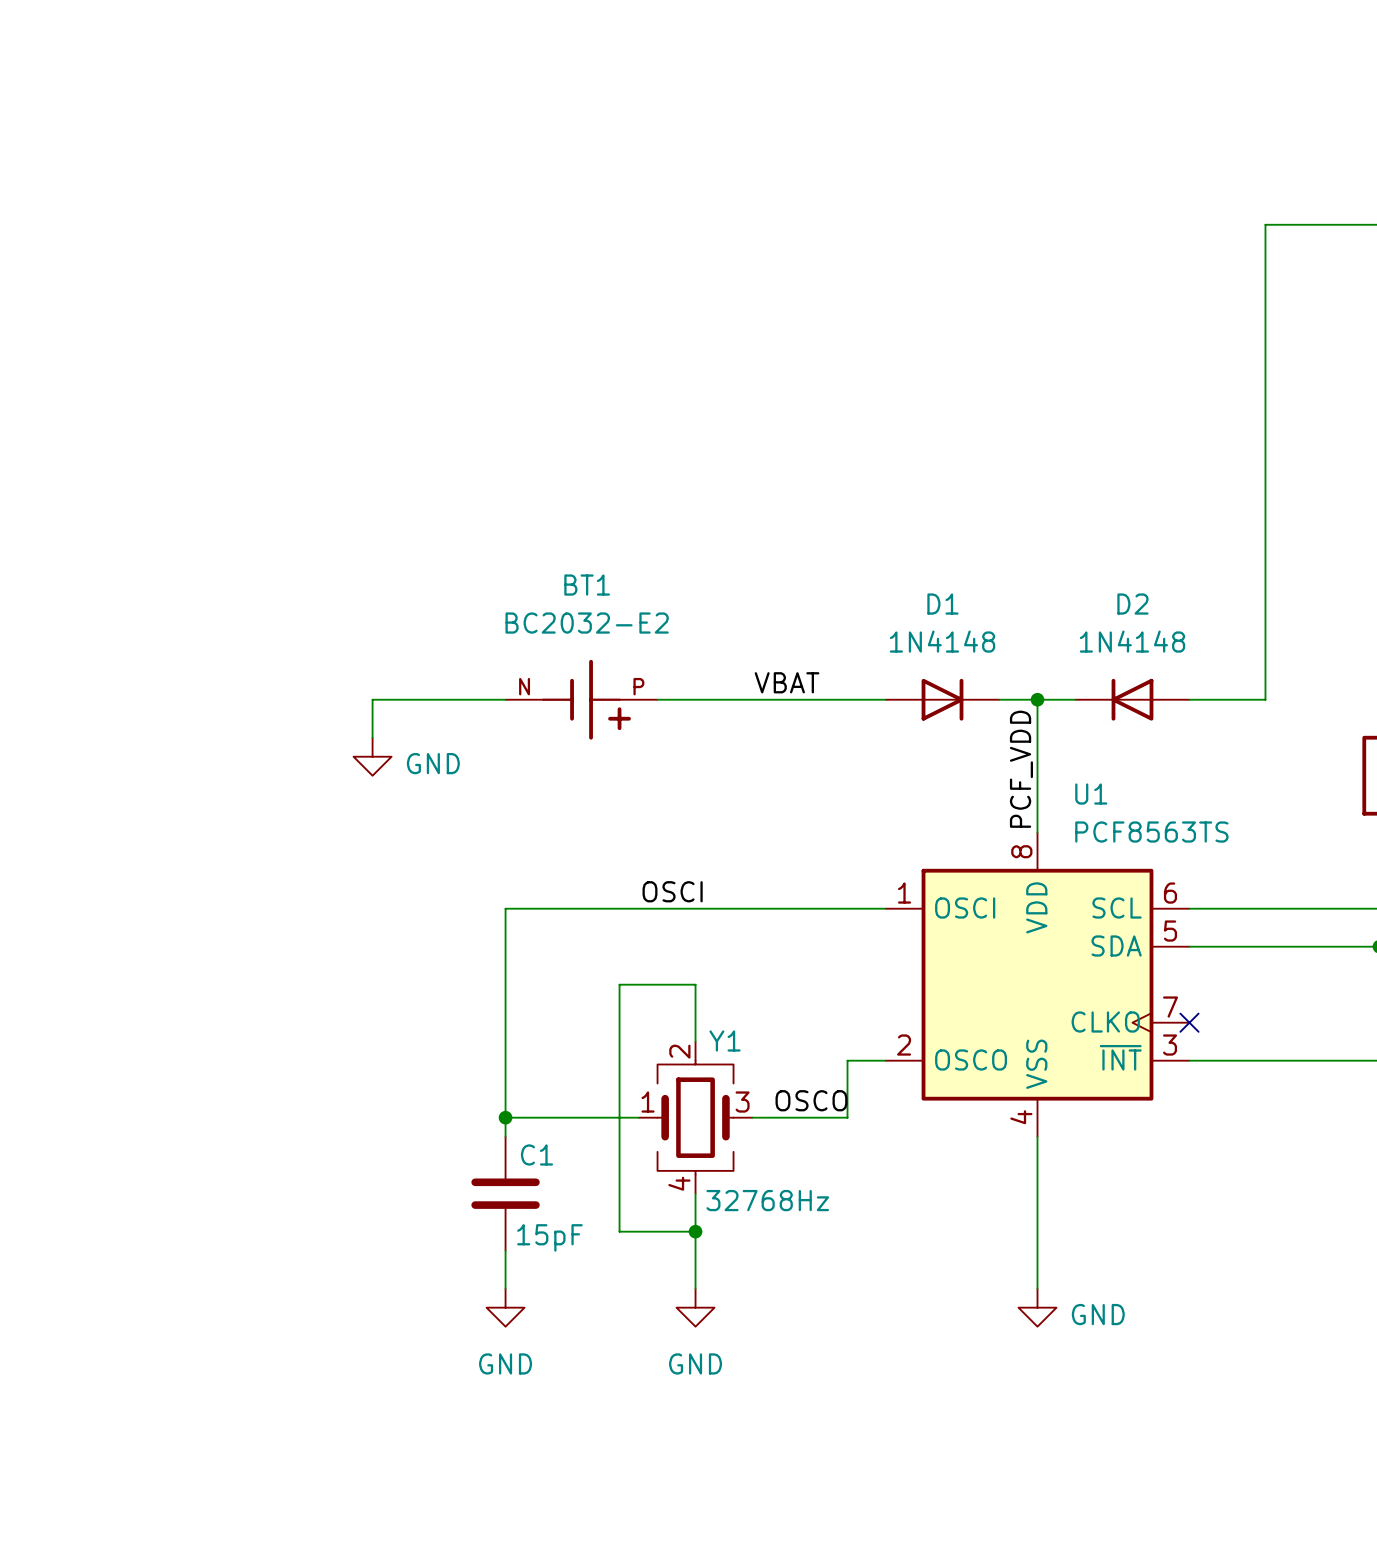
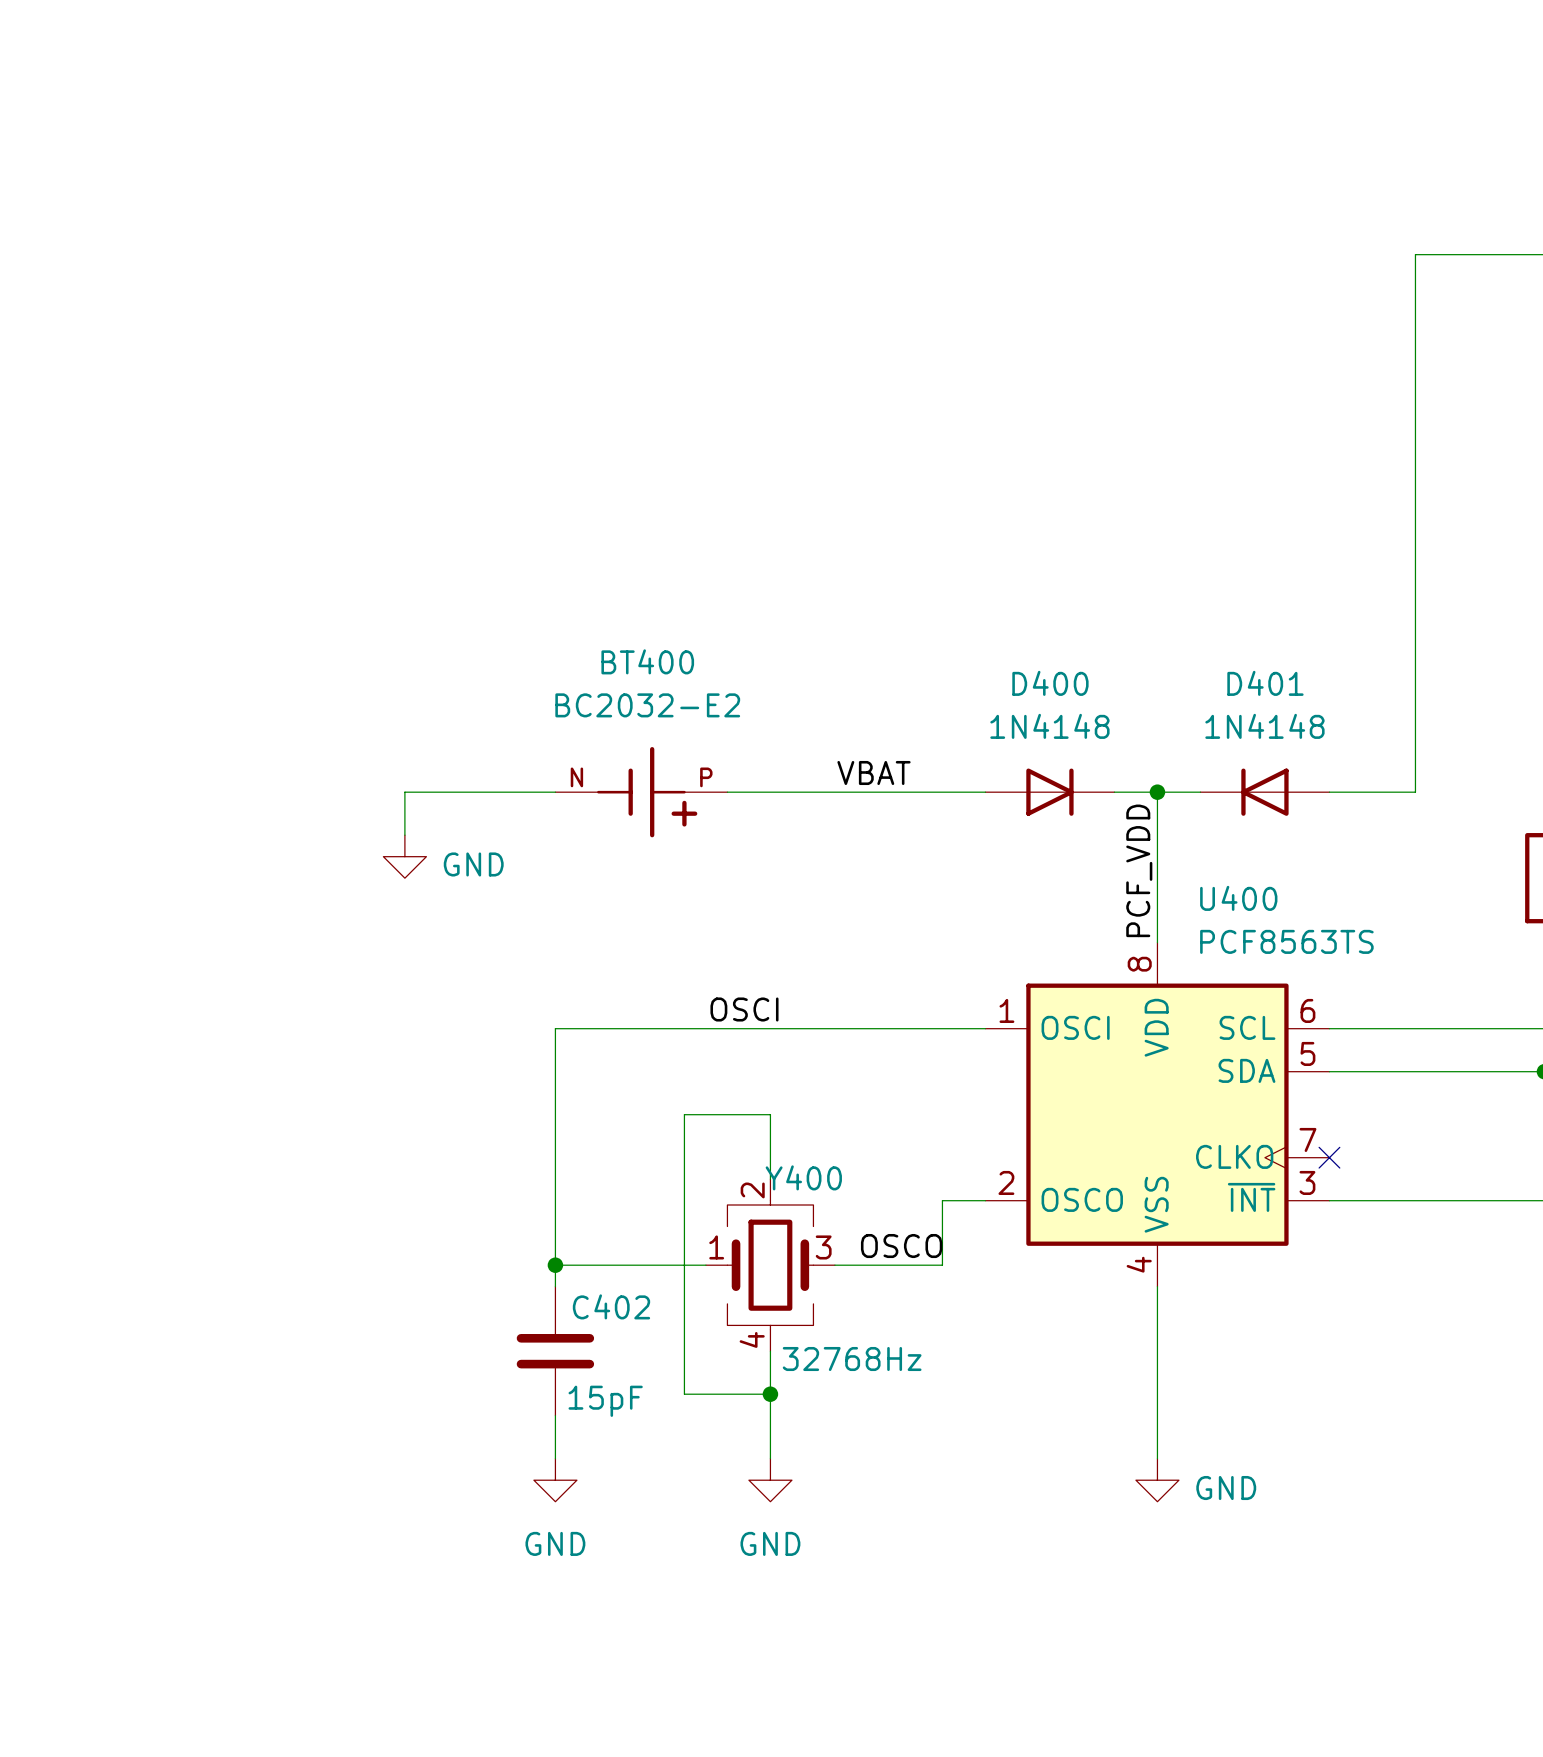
BT1 name: BT1 (587, 585) -> BT400 (647, 661)
D1 name: D1 (942, 604) -> D400 (1050, 683)
D2 name: D2 (1132, 604) -> D401 (1265, 683)
U1 name: U1 (1091, 794) -> U400 (1238, 898)
Y1 name: Y1 (725, 1040) -> Y400 (803, 1177)
C1 name: C1 (537, 1154) -> C402 (611, 1306)

